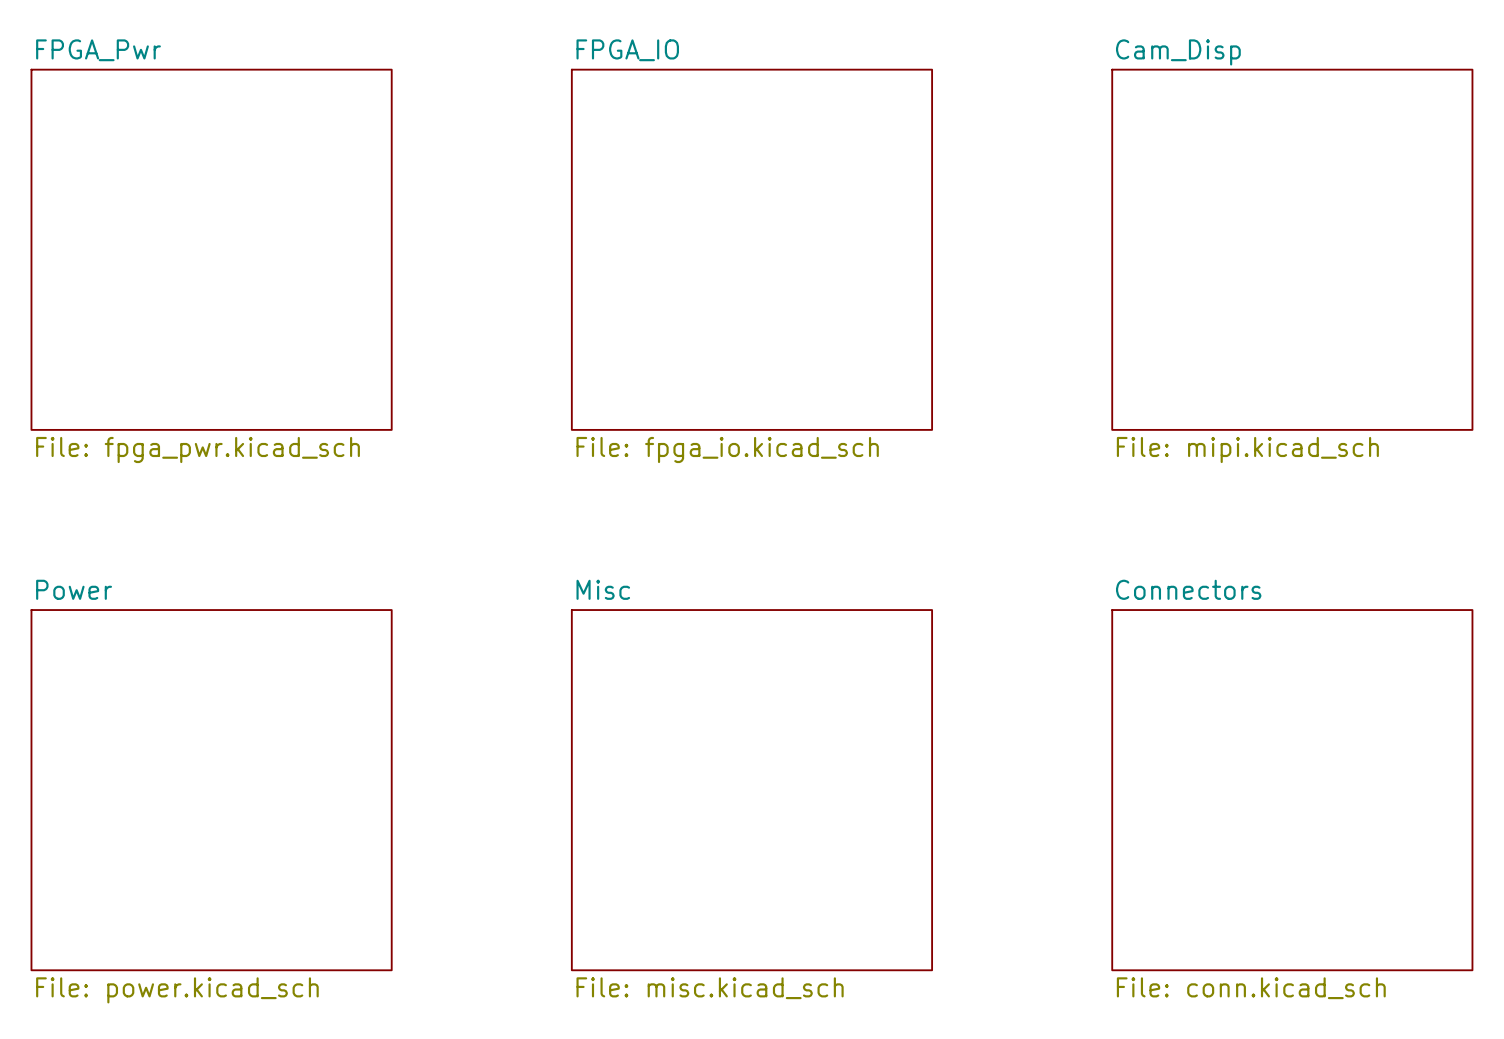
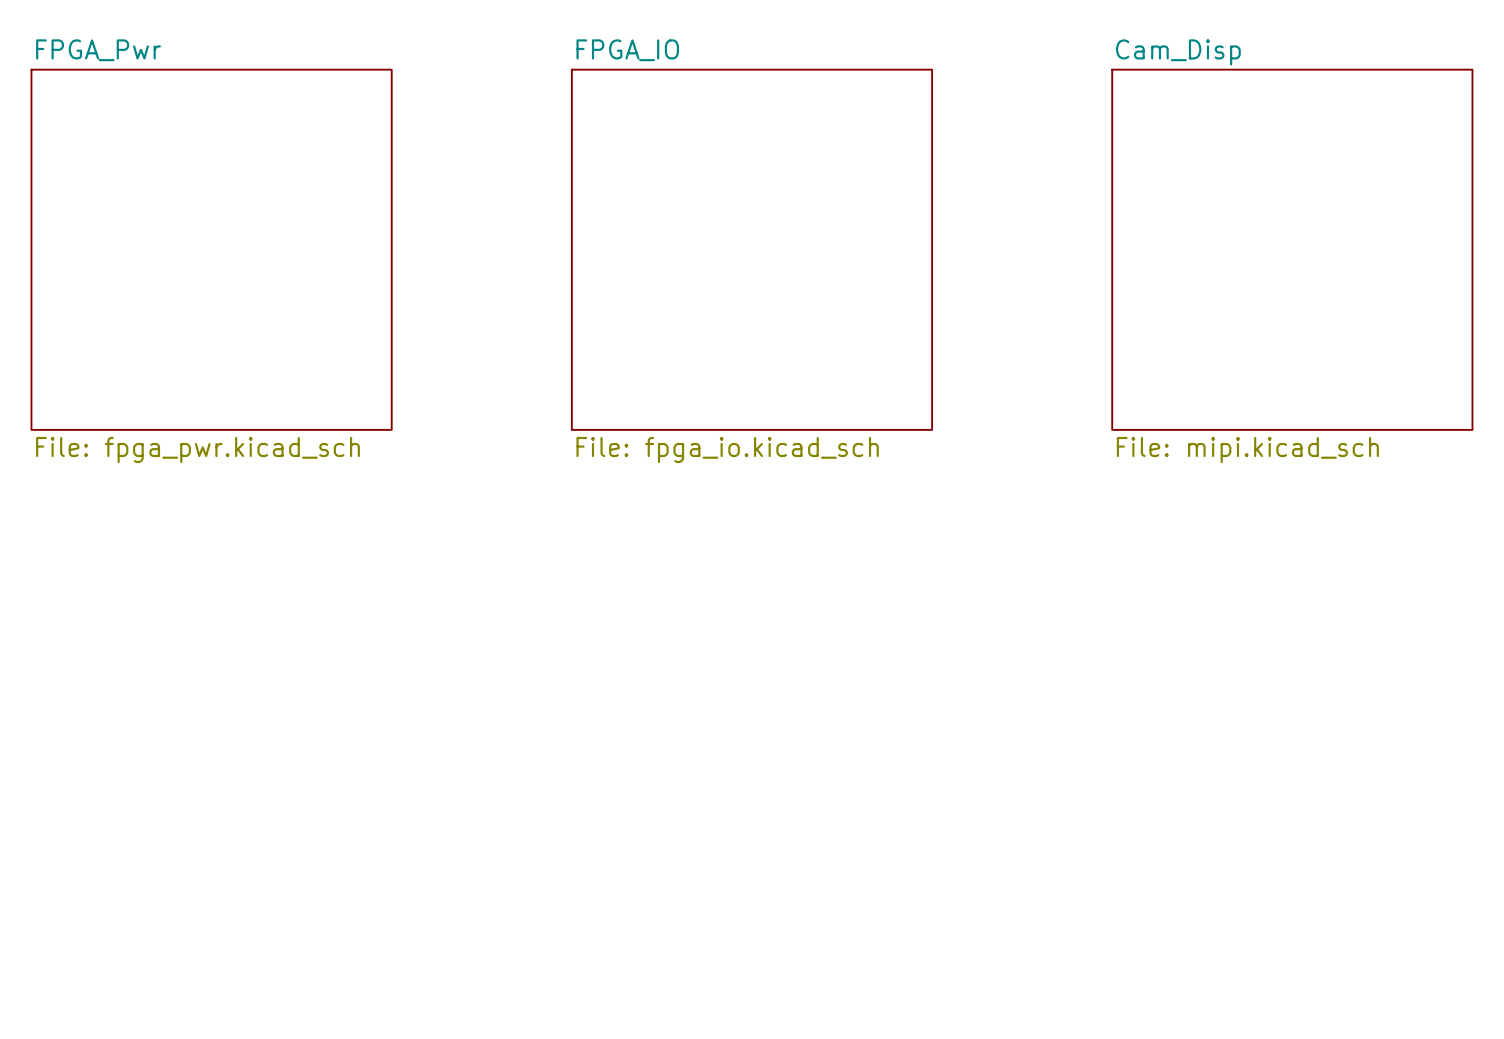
sheet Power: File: power.kicad_sch (211, 790) -> none
sheet Misc: File: misc.kicad_sch (751, 790) -> none
sheet Connectors: File: conn.kicad_sch (1292, 790) -> none

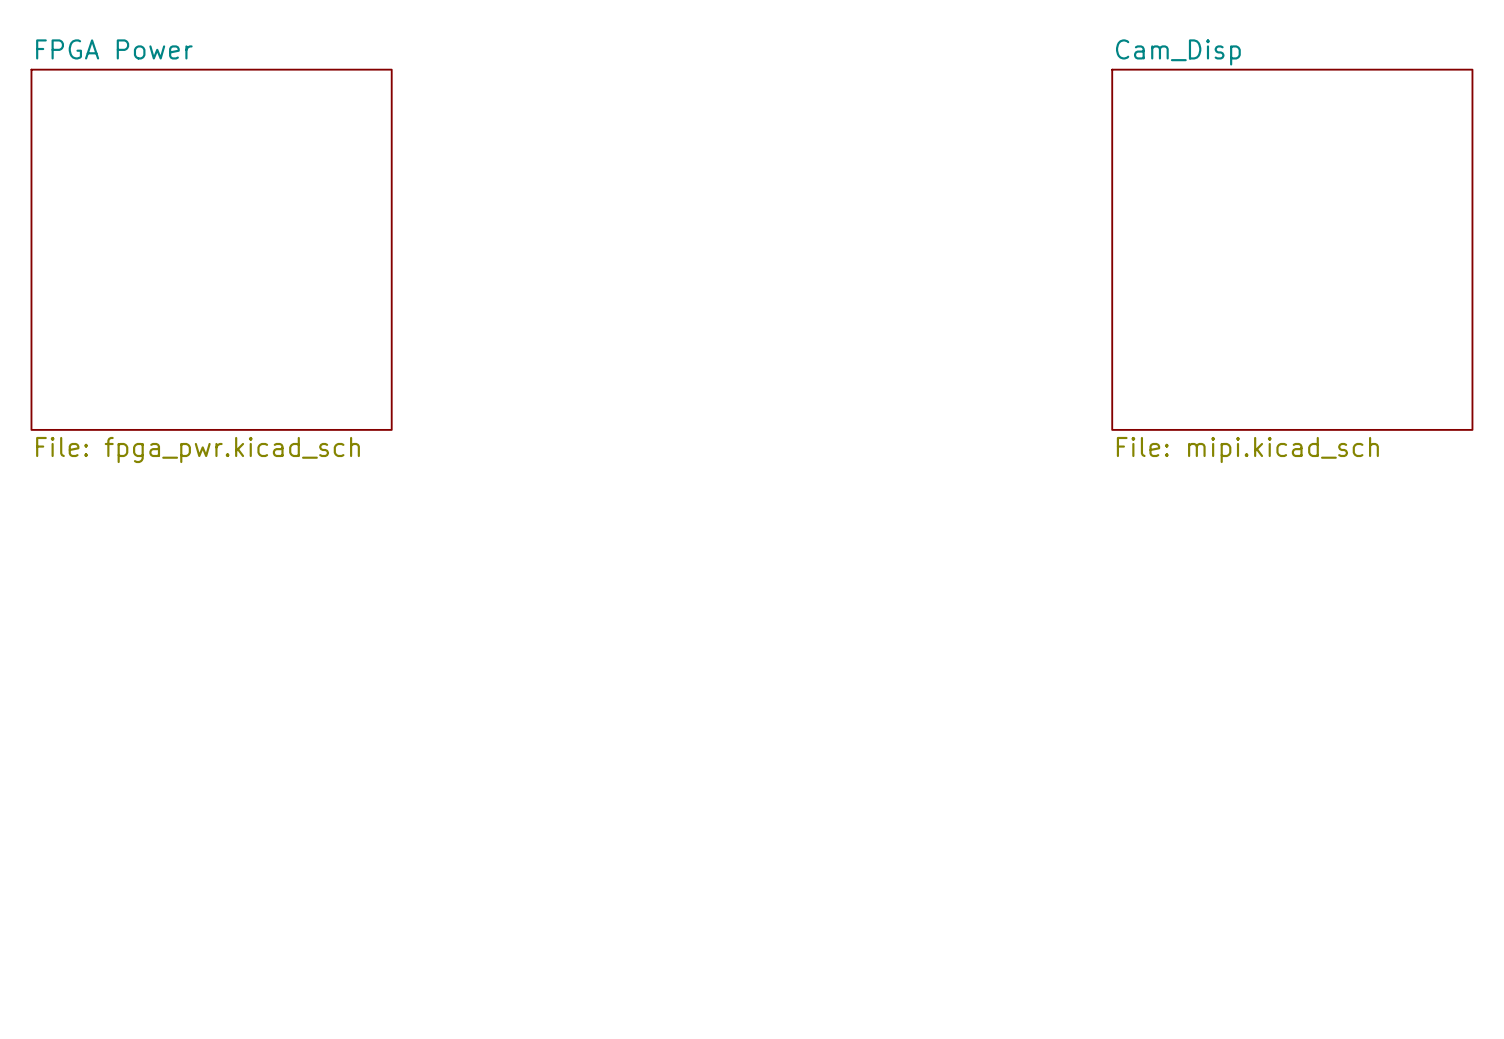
sheet FPGA_Pwr name: FPGA_Pwr (98, 50) -> FPGA Power (114, 49)
sheet FPGA_IO: File: fpga_io.kicad_sch (751, 249) -> none

